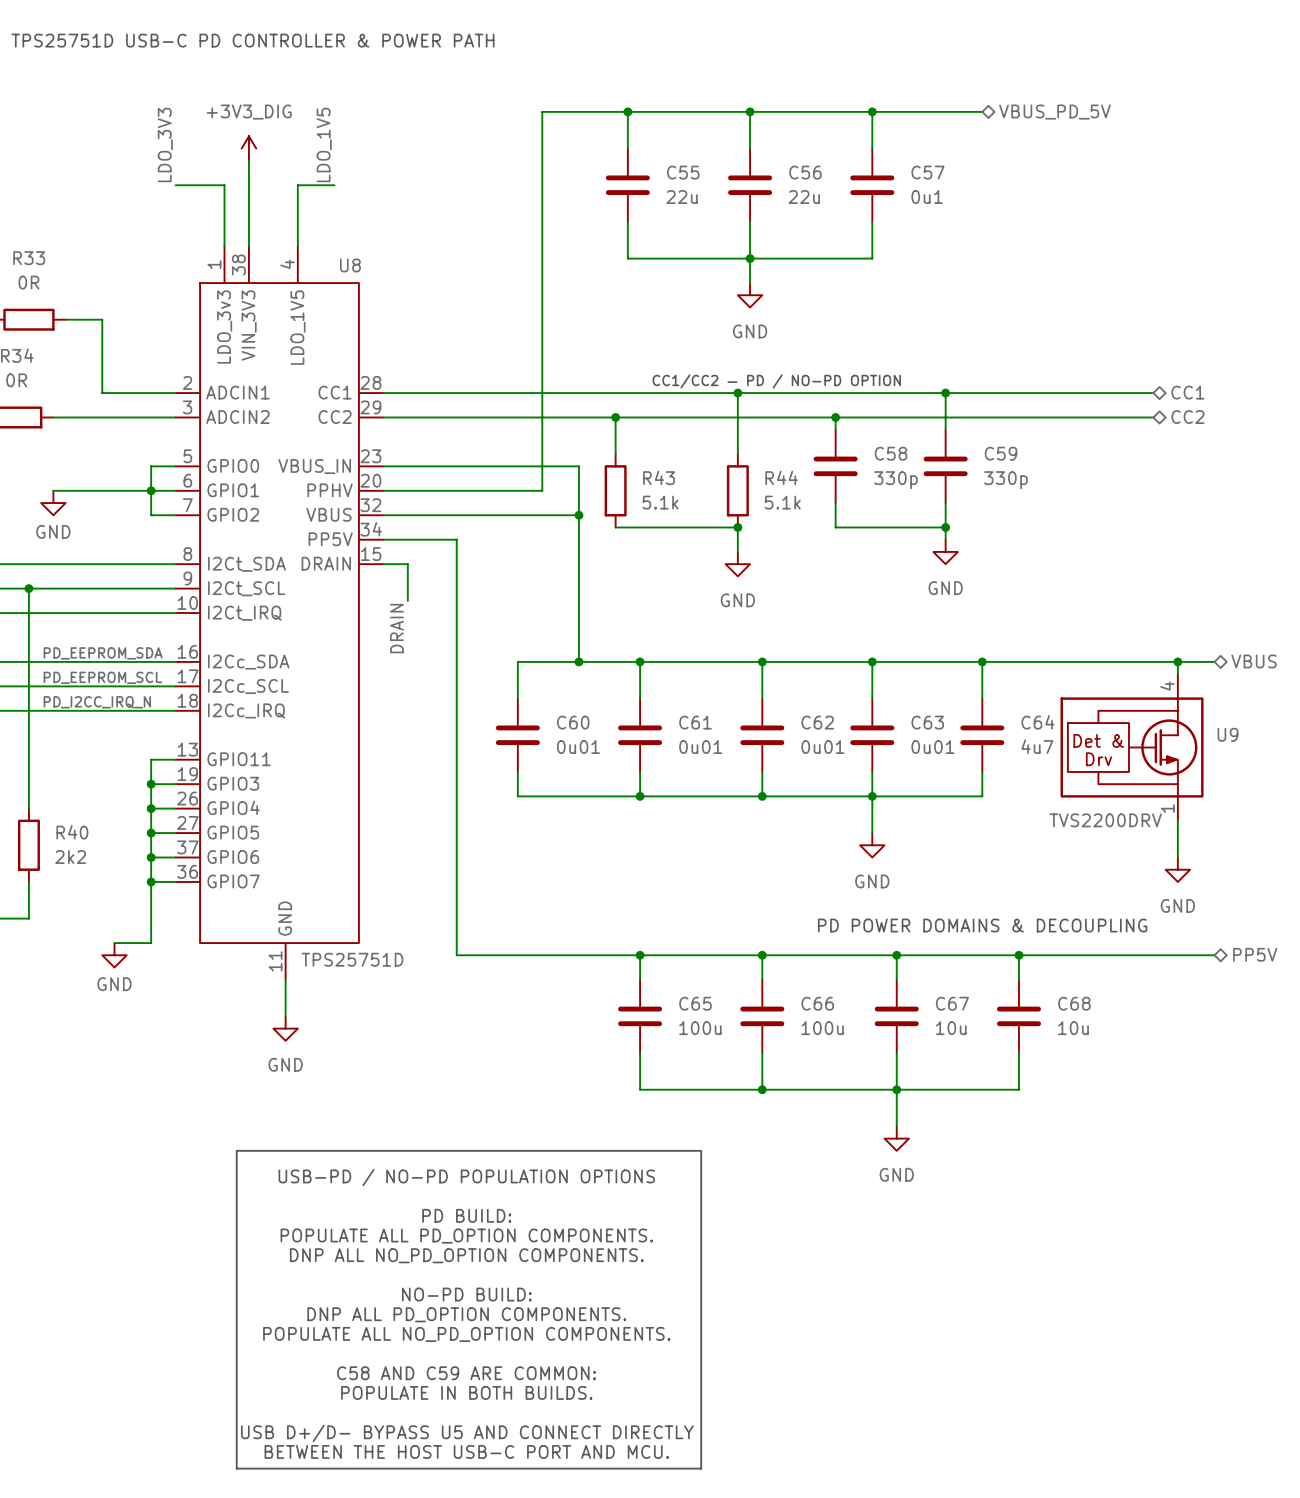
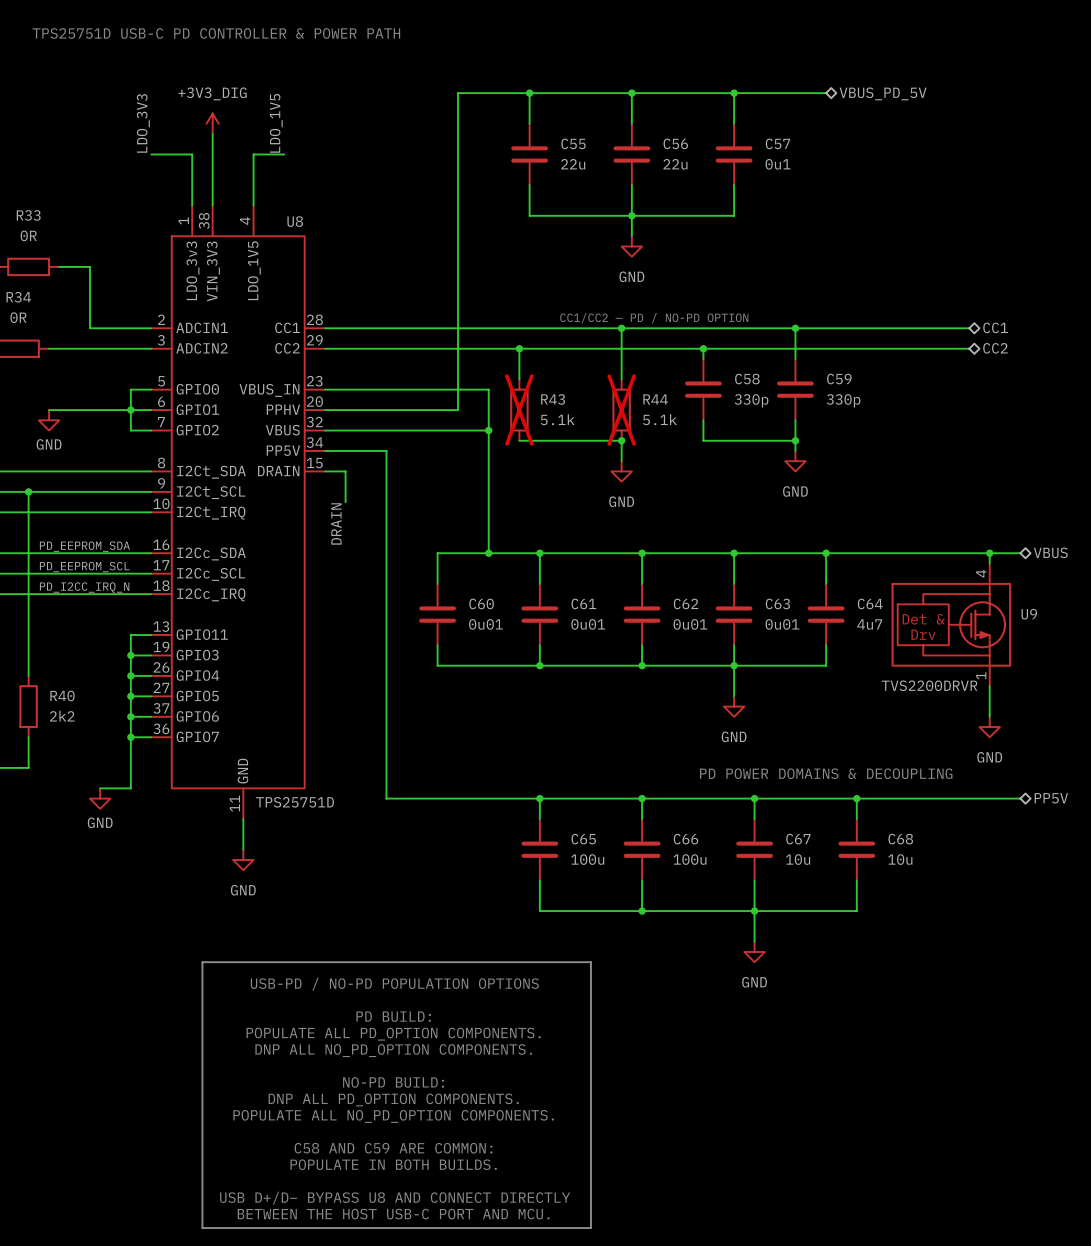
R43 do-not-place cross: none -> (519, 410)
R44 do-not-place cross: none -> (621, 410)
U9 value: TVS2200DRV (1105, 820) -> TVS2200DRVR (929, 685)
text: USB D+/D− BYPASS U5 AND CONNECT DIRECTLY (467, 1433) -> USB D+/D− BYPASS U8 AND CONNECT DIRECTLY (395, 1198)

